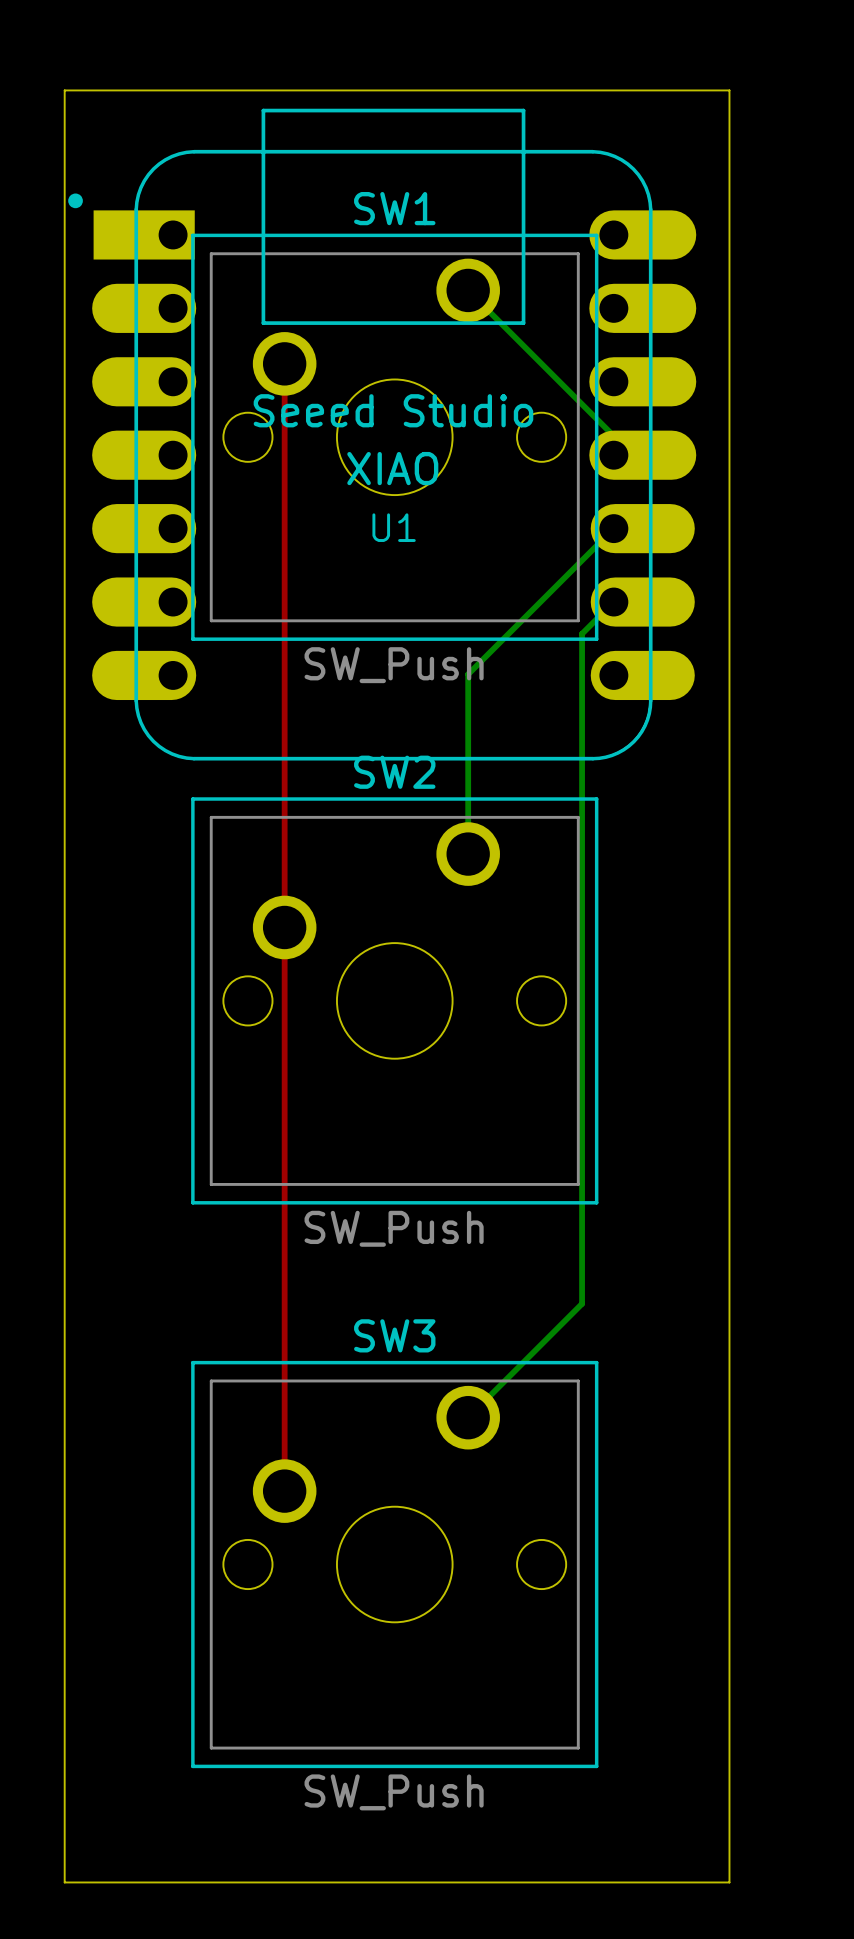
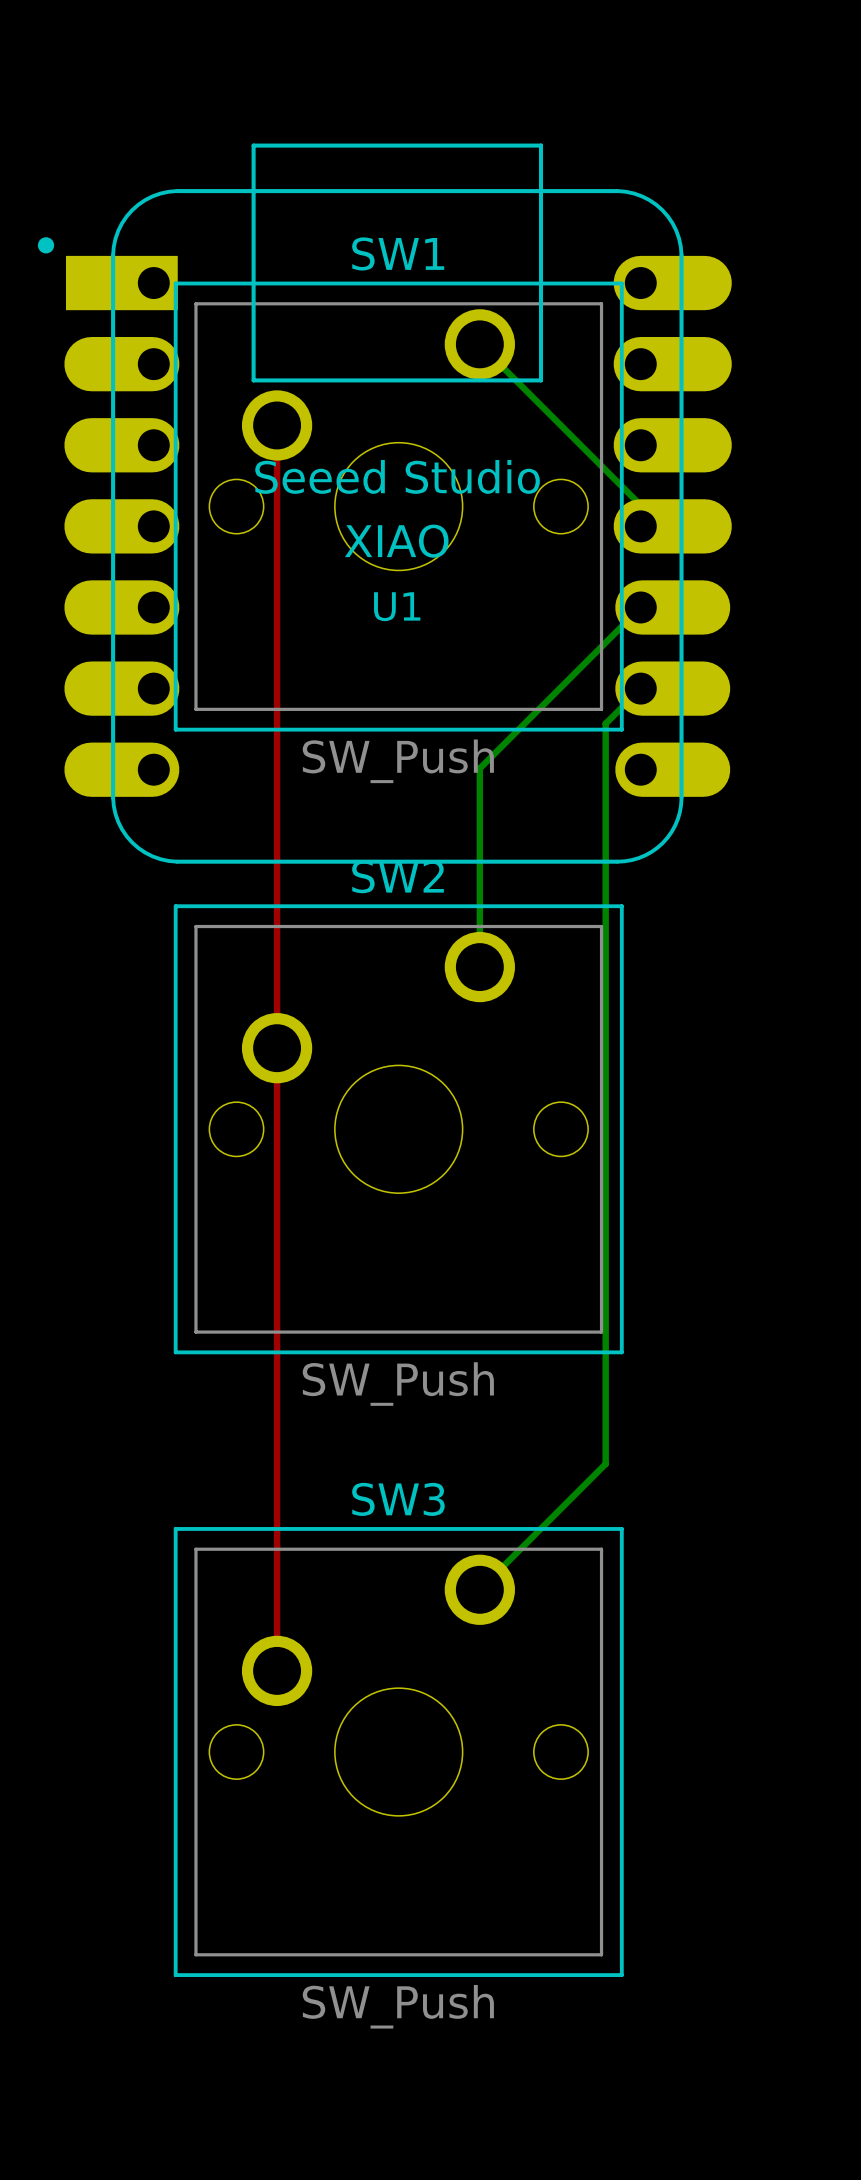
board edge: (64, 90) (729, 90) (729, 1882) (64, 1882) (64, 90) -> none

